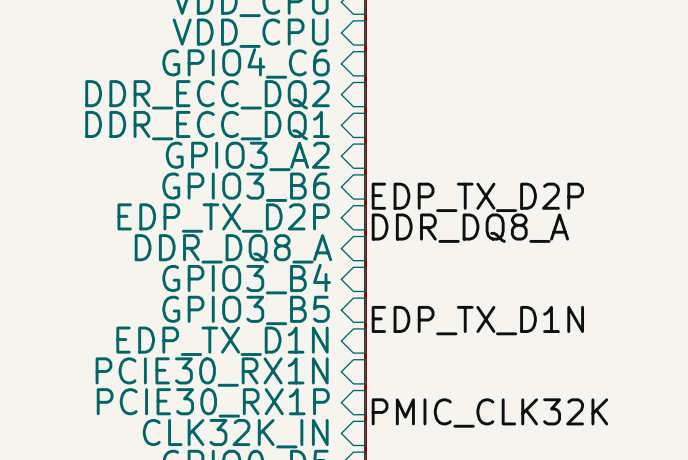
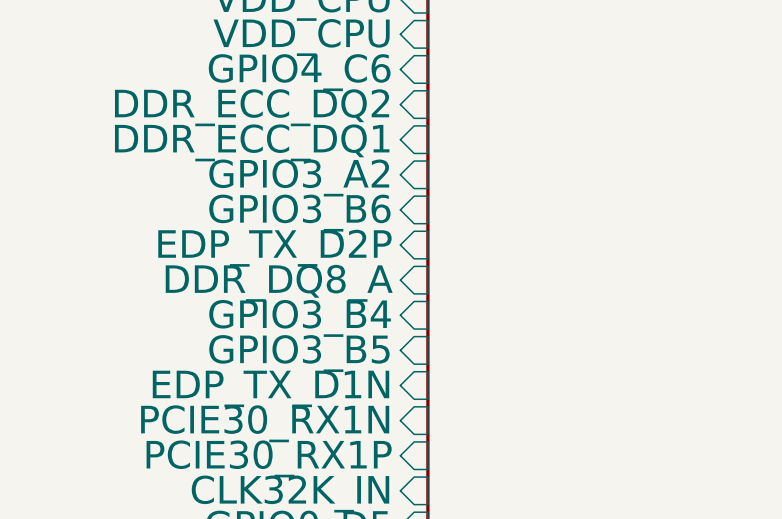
label: EDP_TX_D2P (477, 197) -> none
label: DDR_DQ8_A (470, 228) -> none
label: EDP_TX_D1N (477, 320) -> none
label: PMIC_CLK32K (489, 413) -> none

